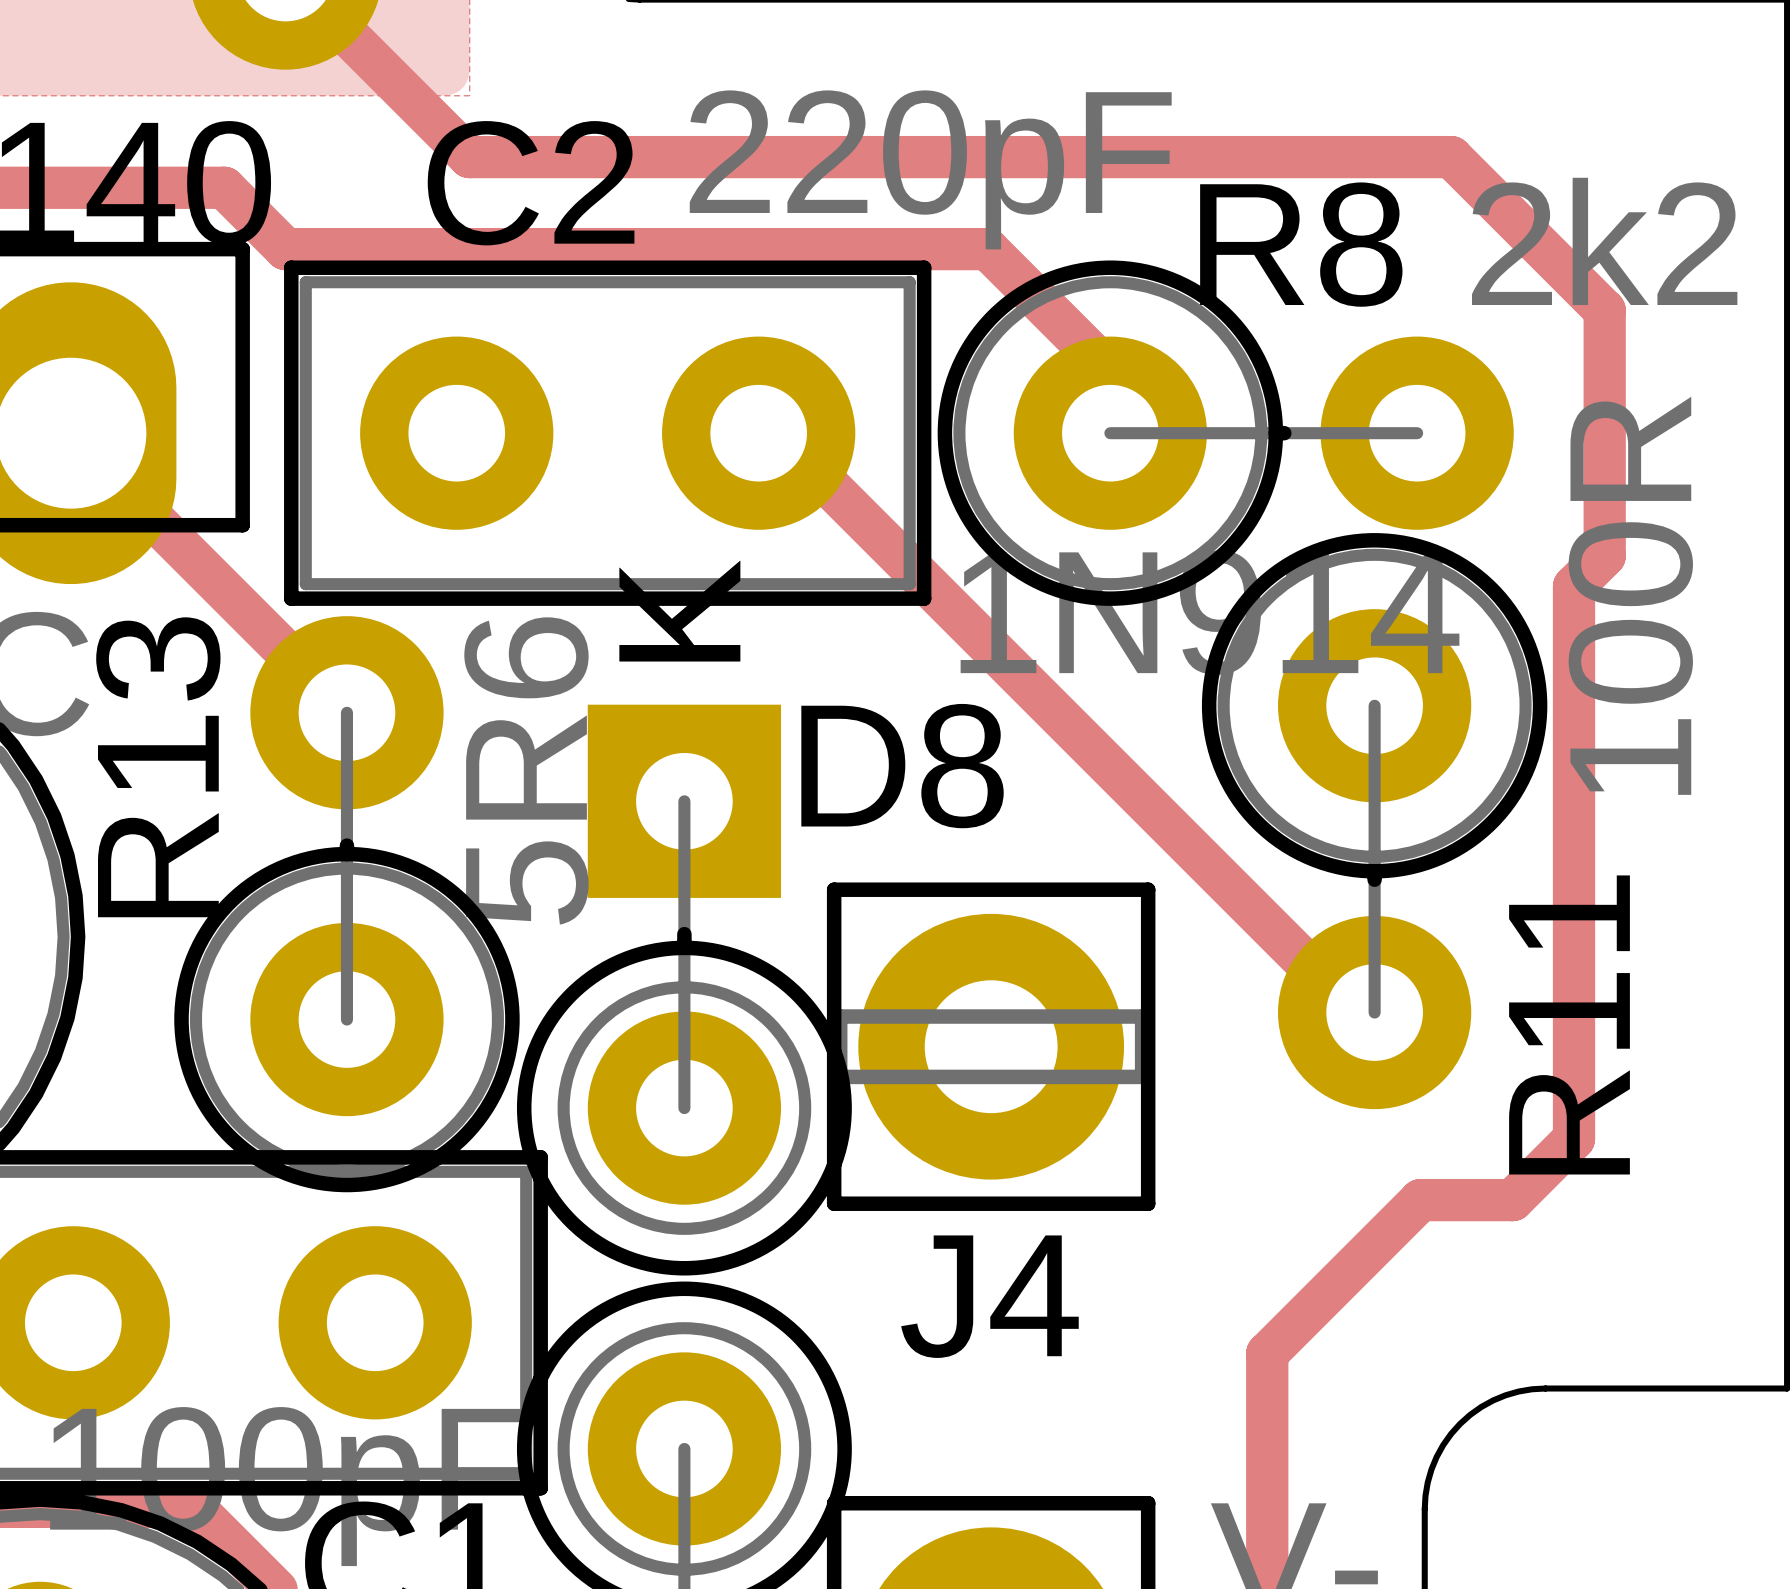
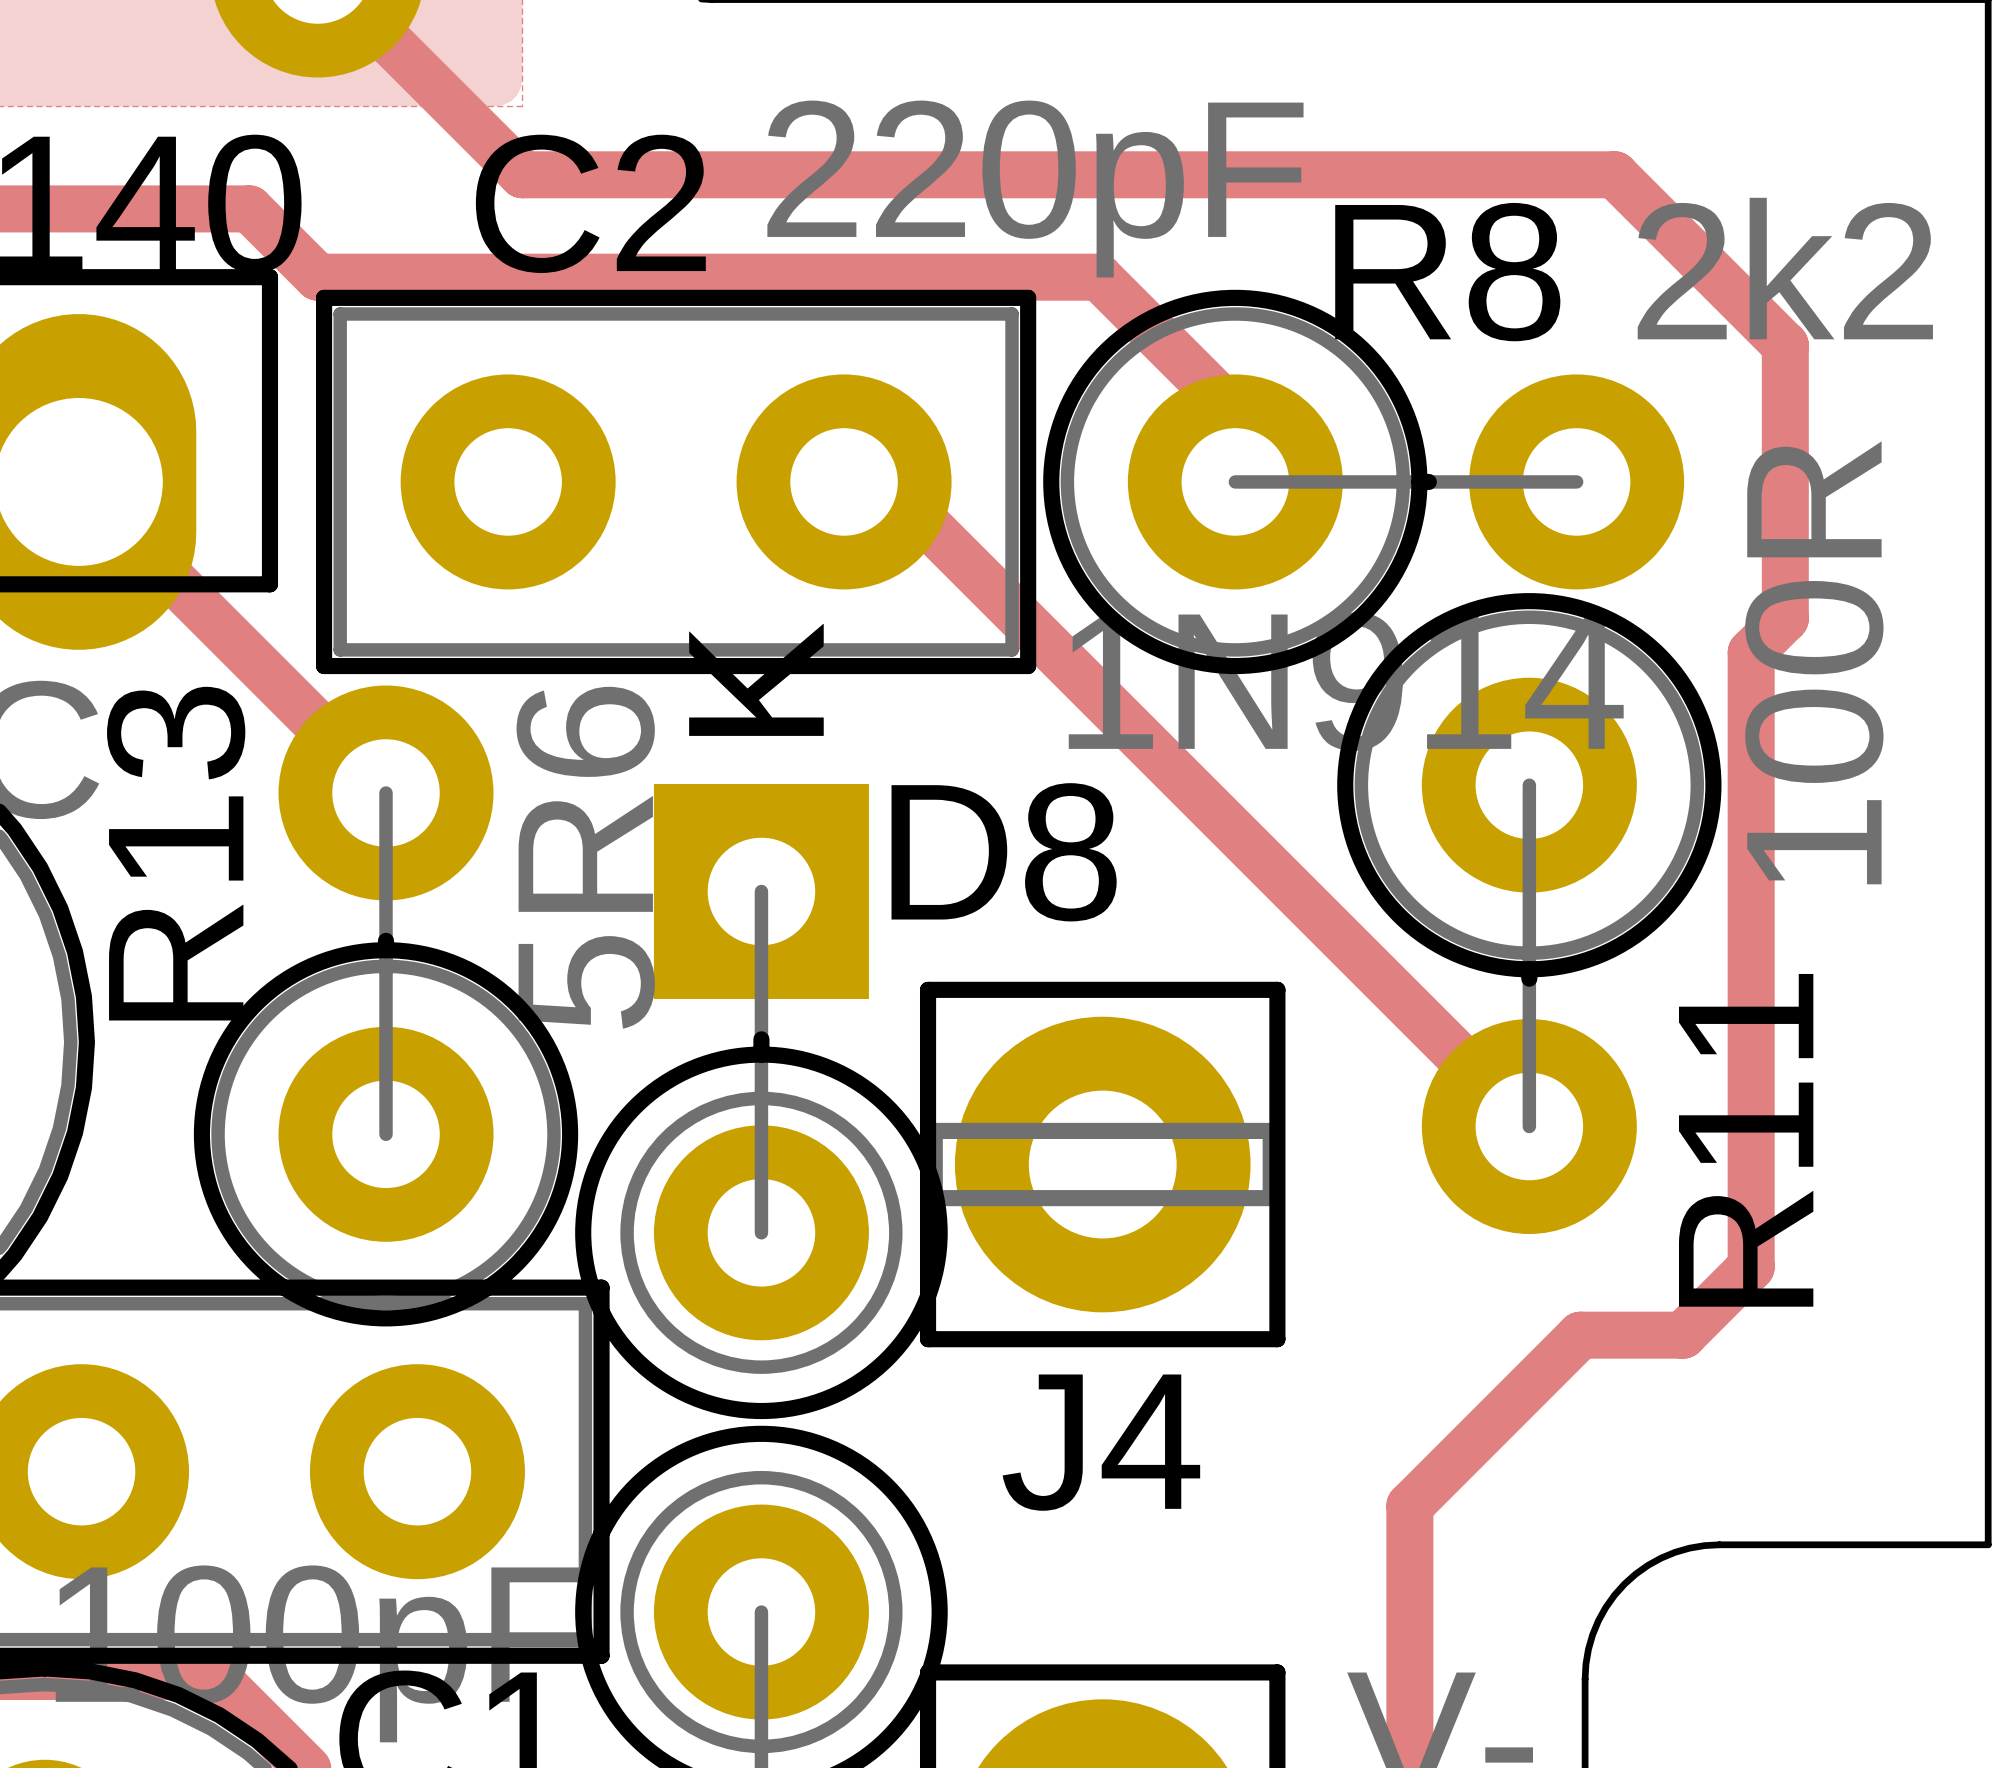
track: (776, 433) (1355, 1012) -> (863, 481) (884, 481) (1529, 1126)

